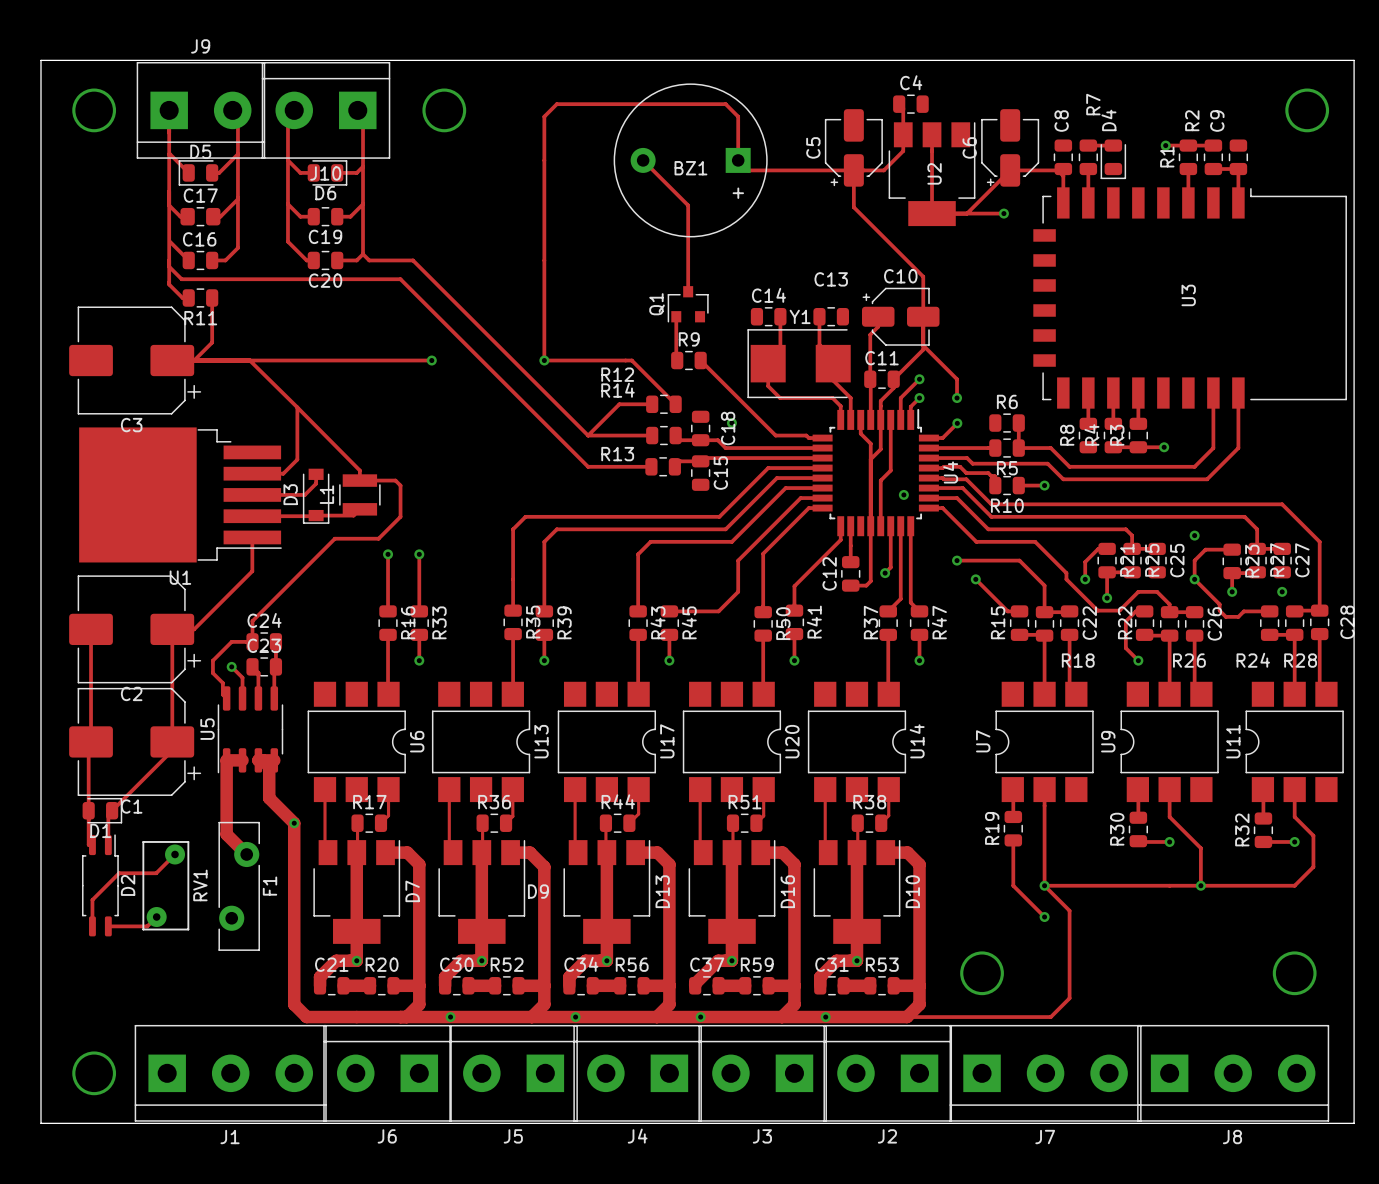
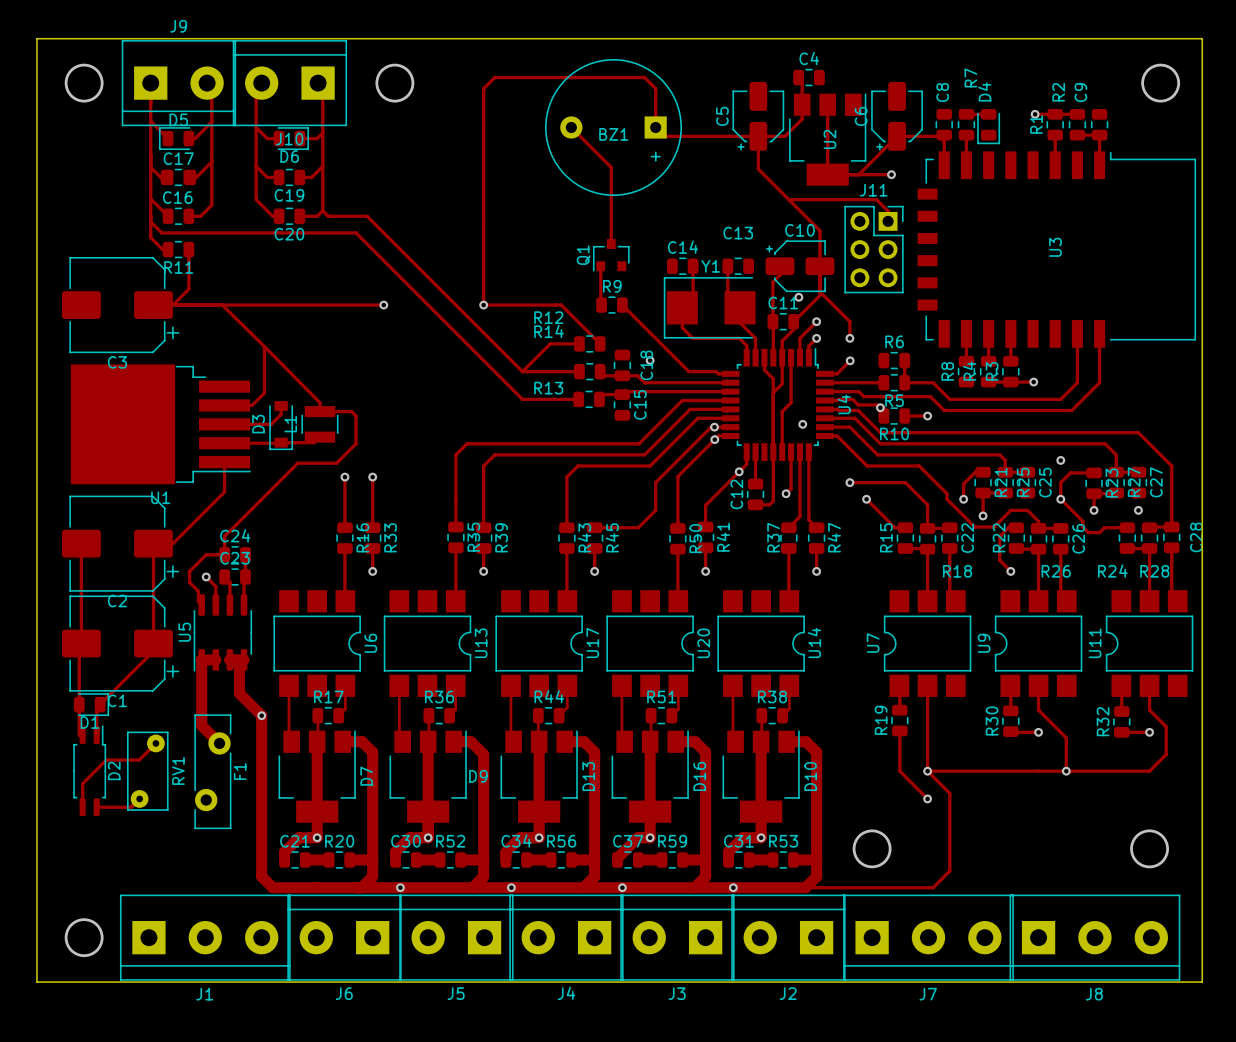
track: none -> (788, 199) (876, 199) (888, 211) (888, 221)
J11: none -> (873, 249)
via: none -> (798, 297)
via: none -> (880, 407)
via: none -> (714, 427)
via: none -> (714, 439)
via: none -> (739, 471)

